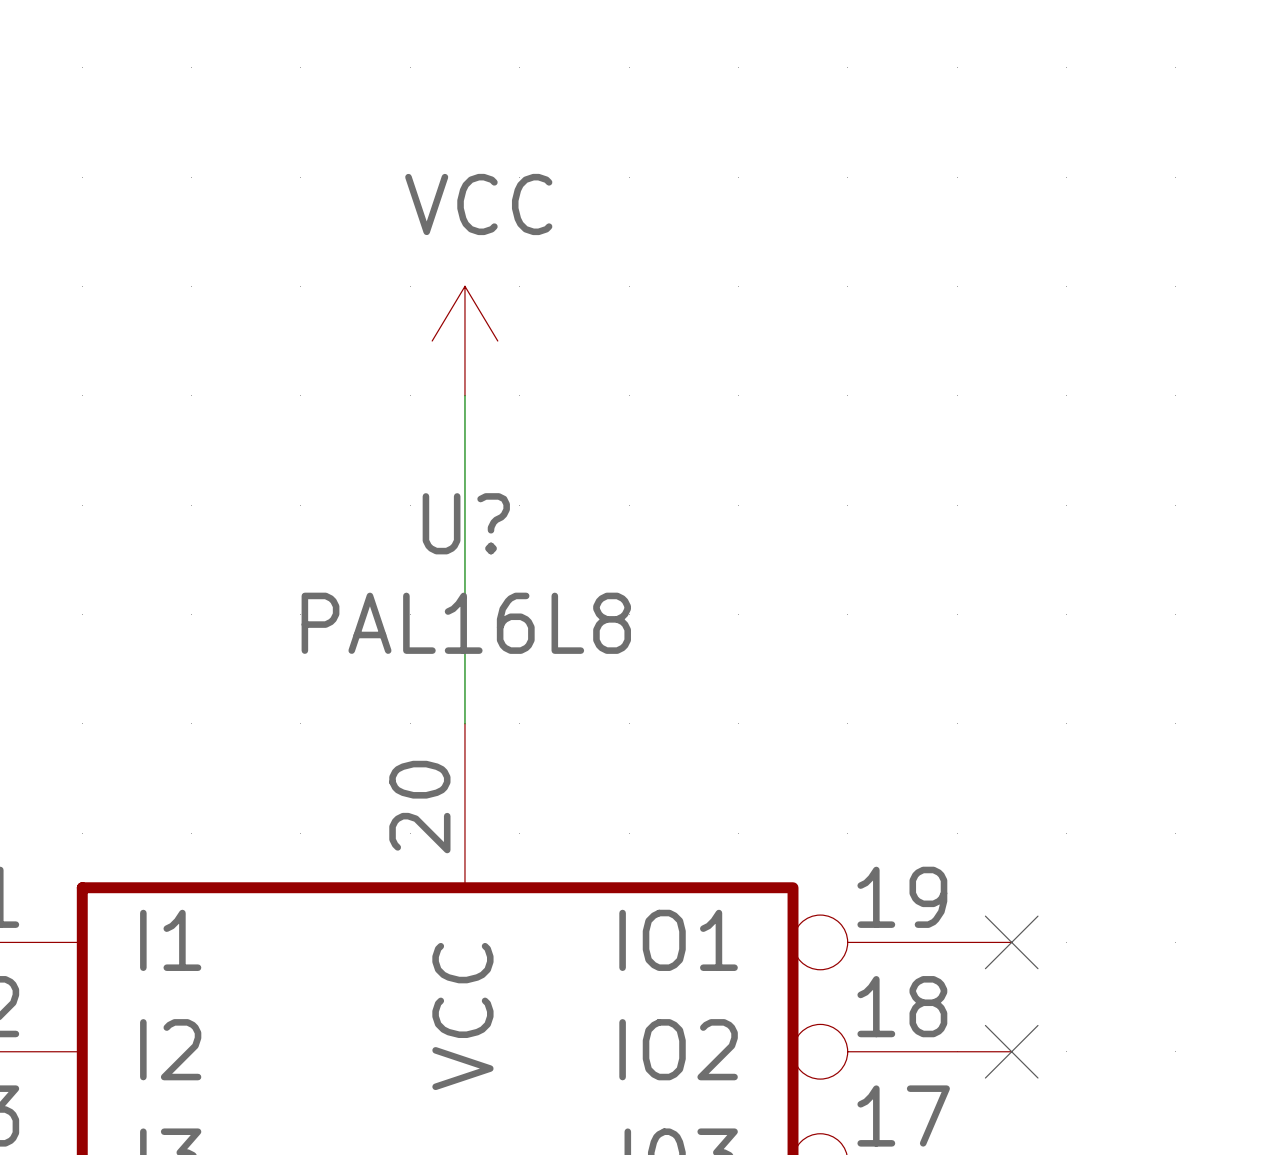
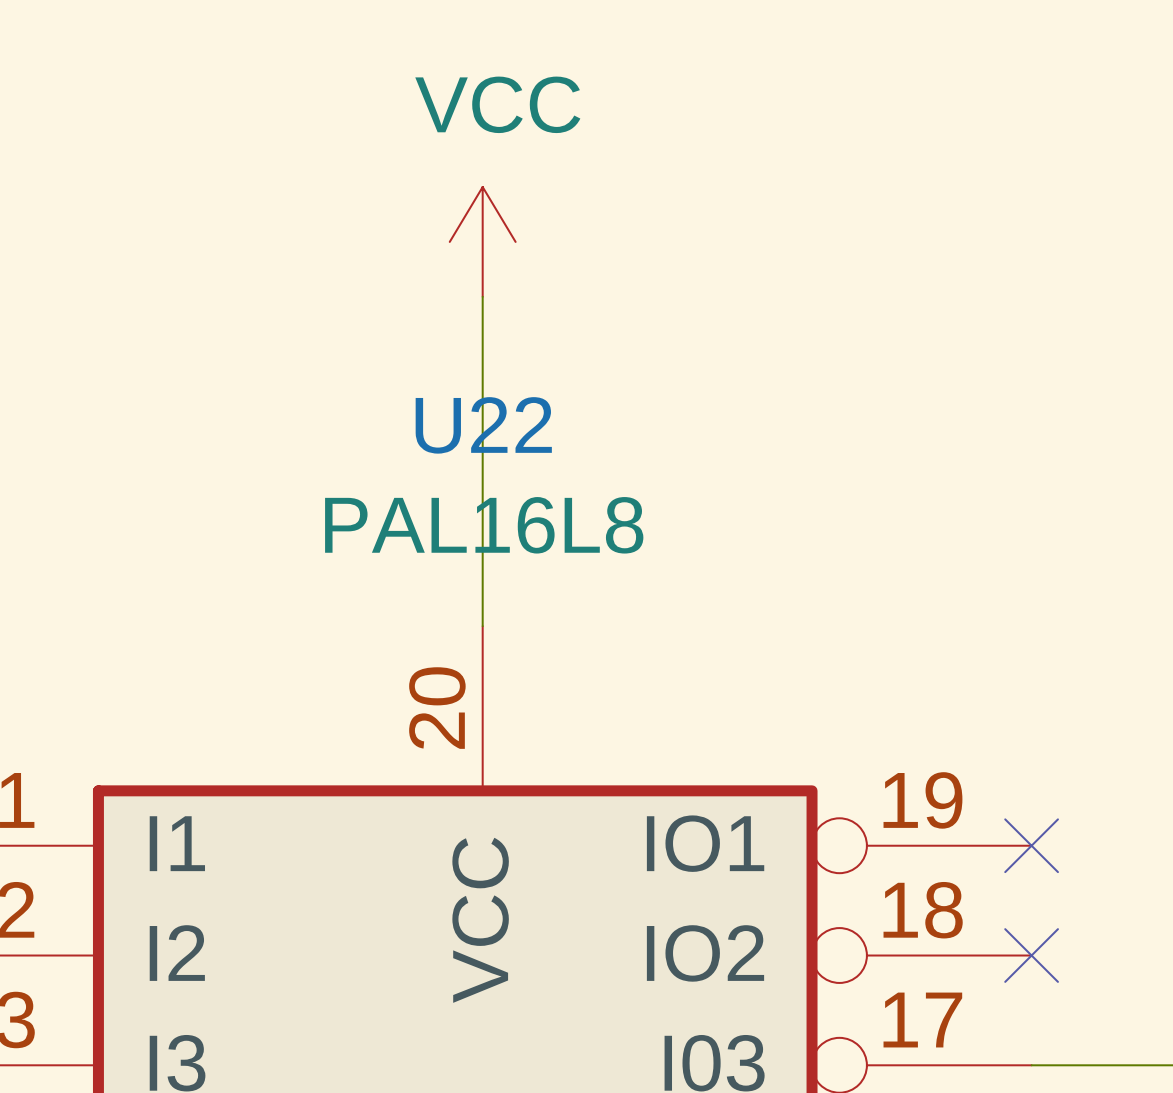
U? name: U? (466, 523) -> U22 (483, 425)

